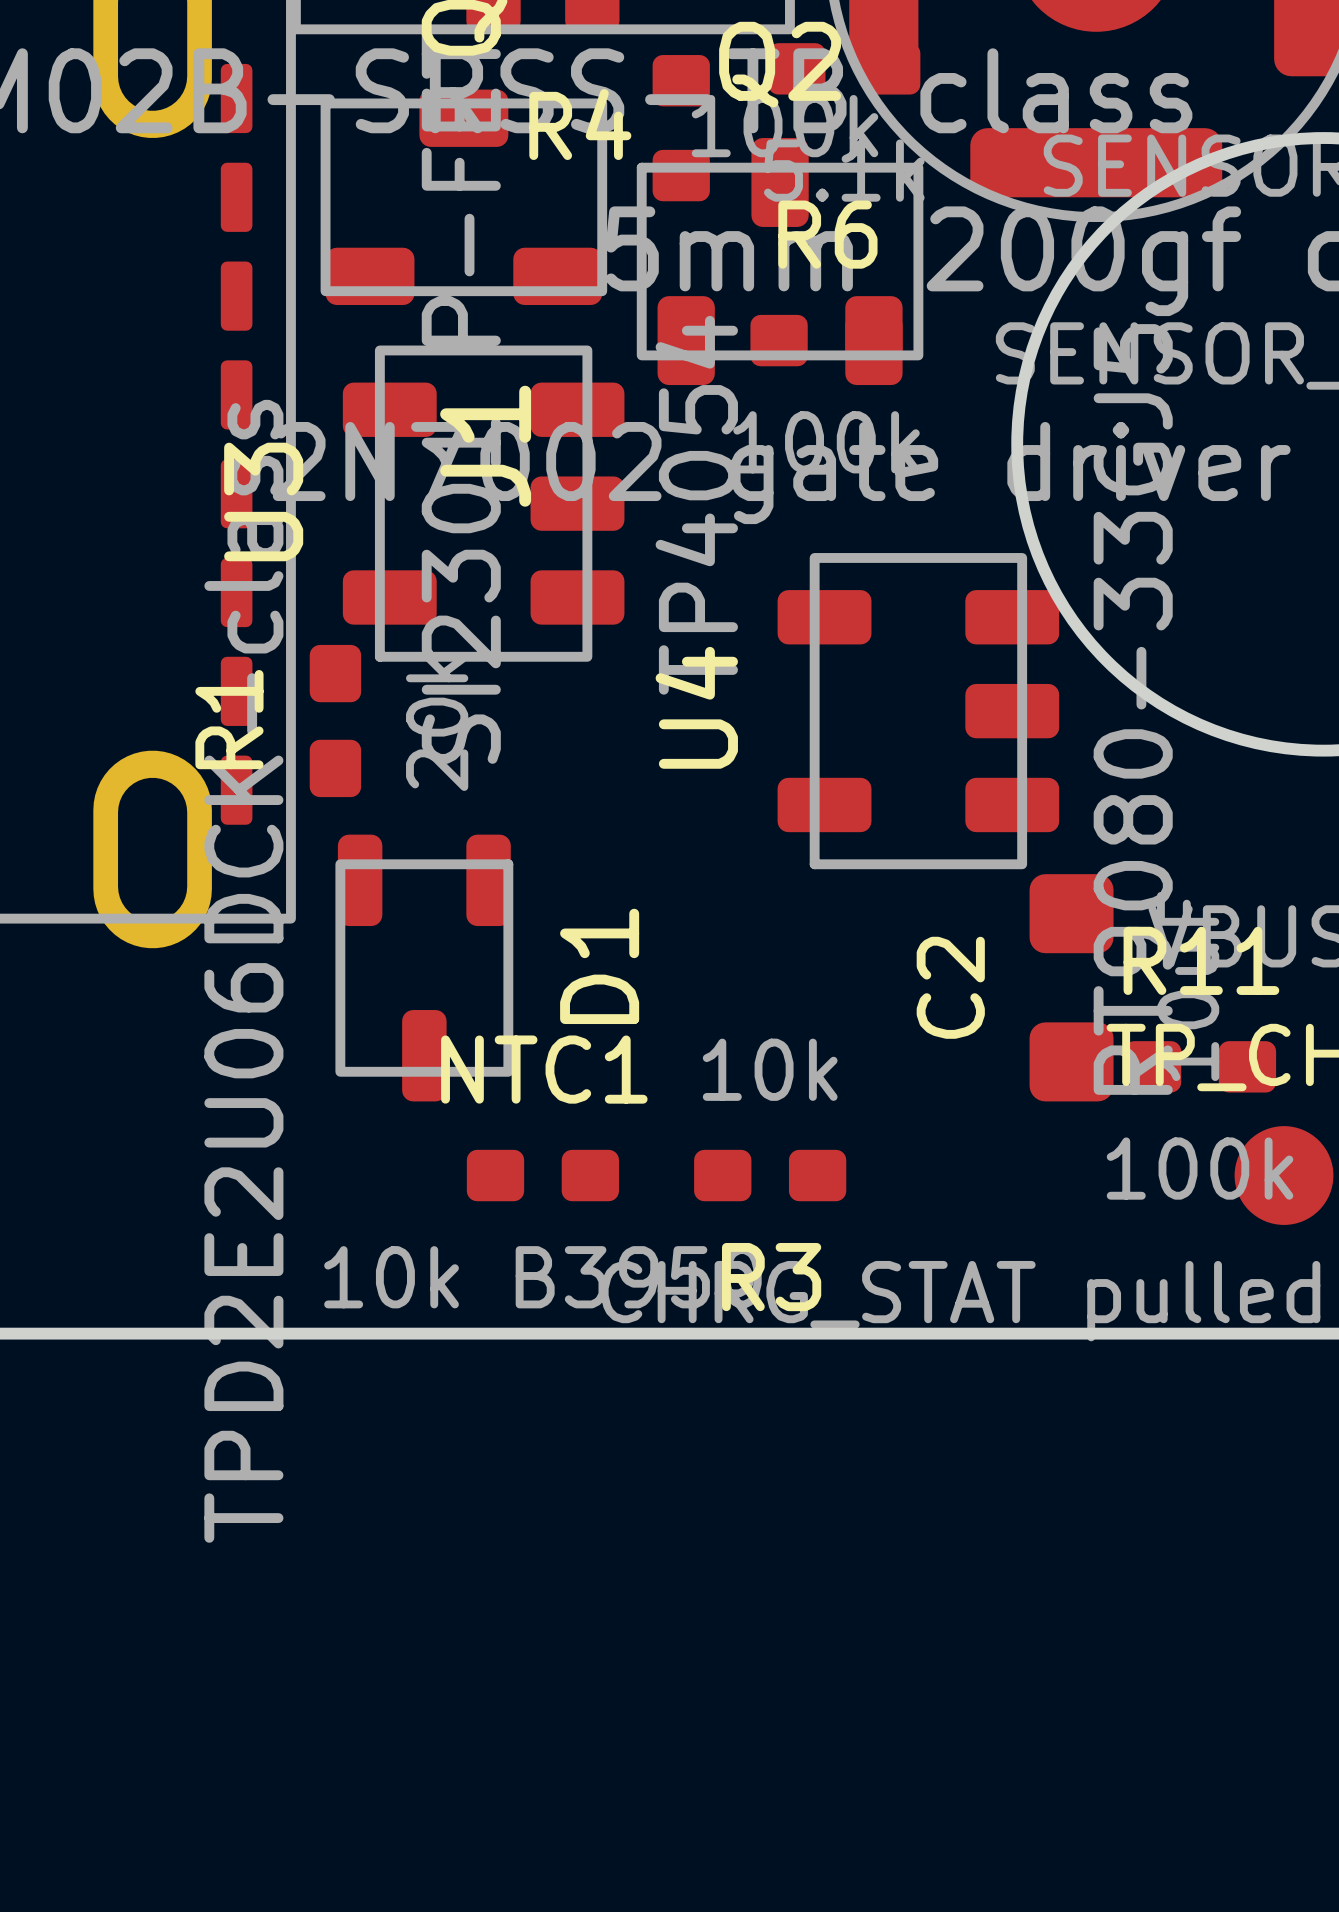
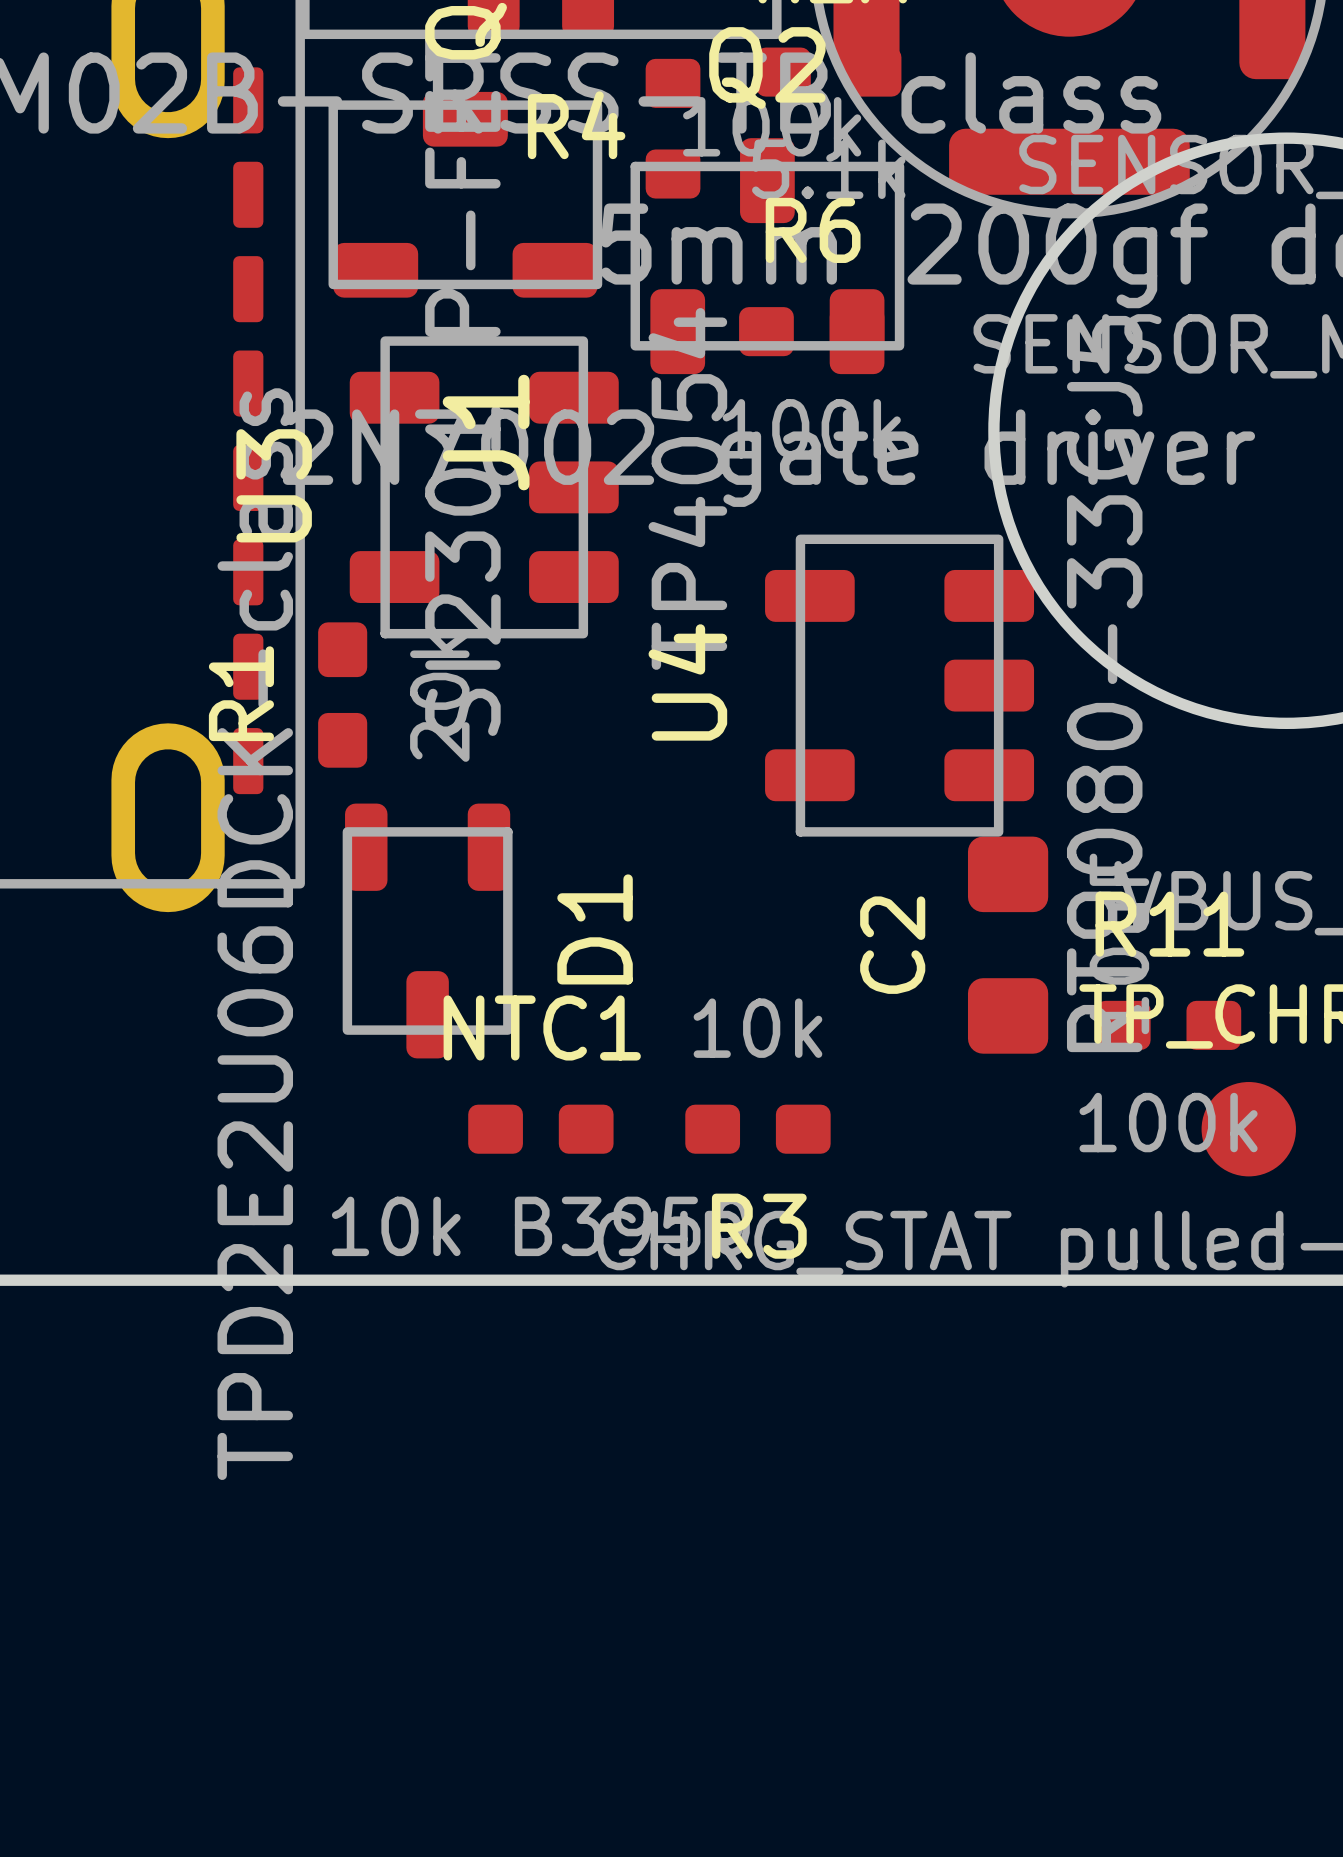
C2 position: (1071, 987) -> (1008, 945)

